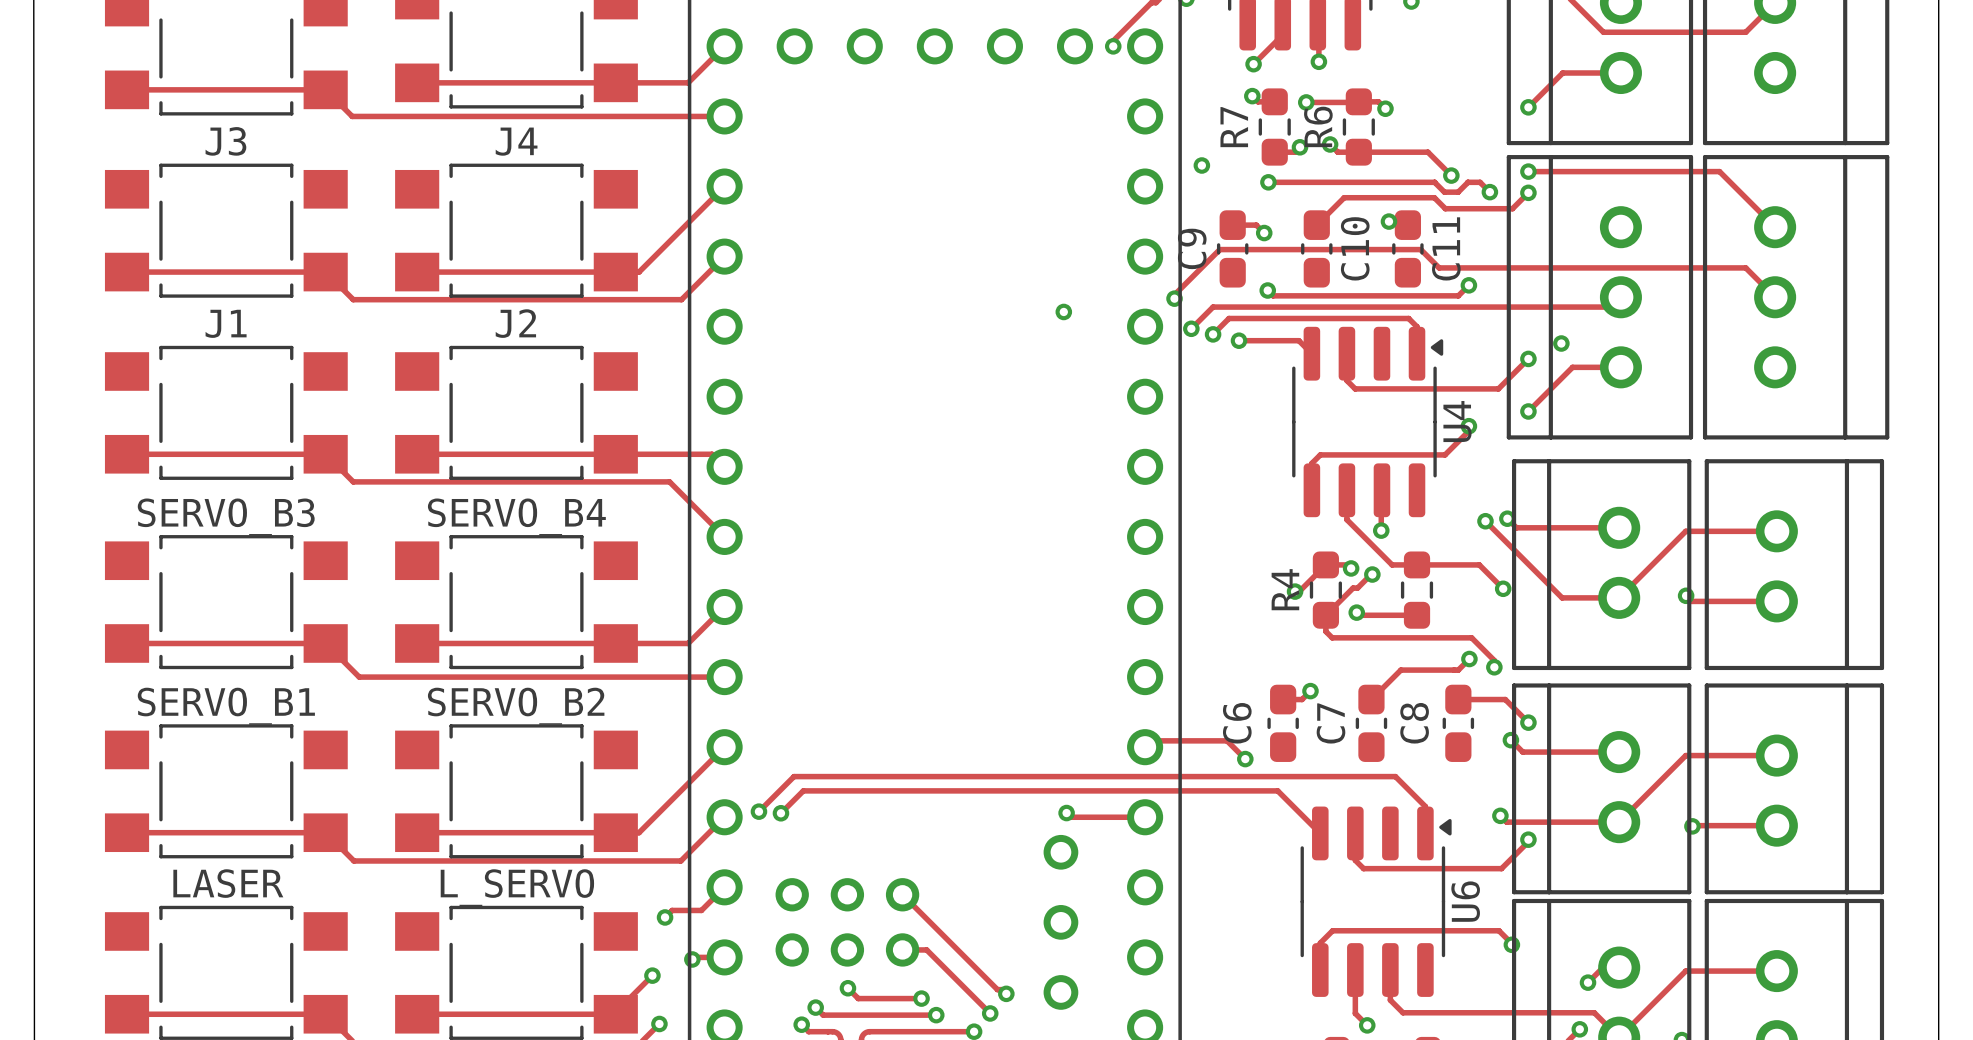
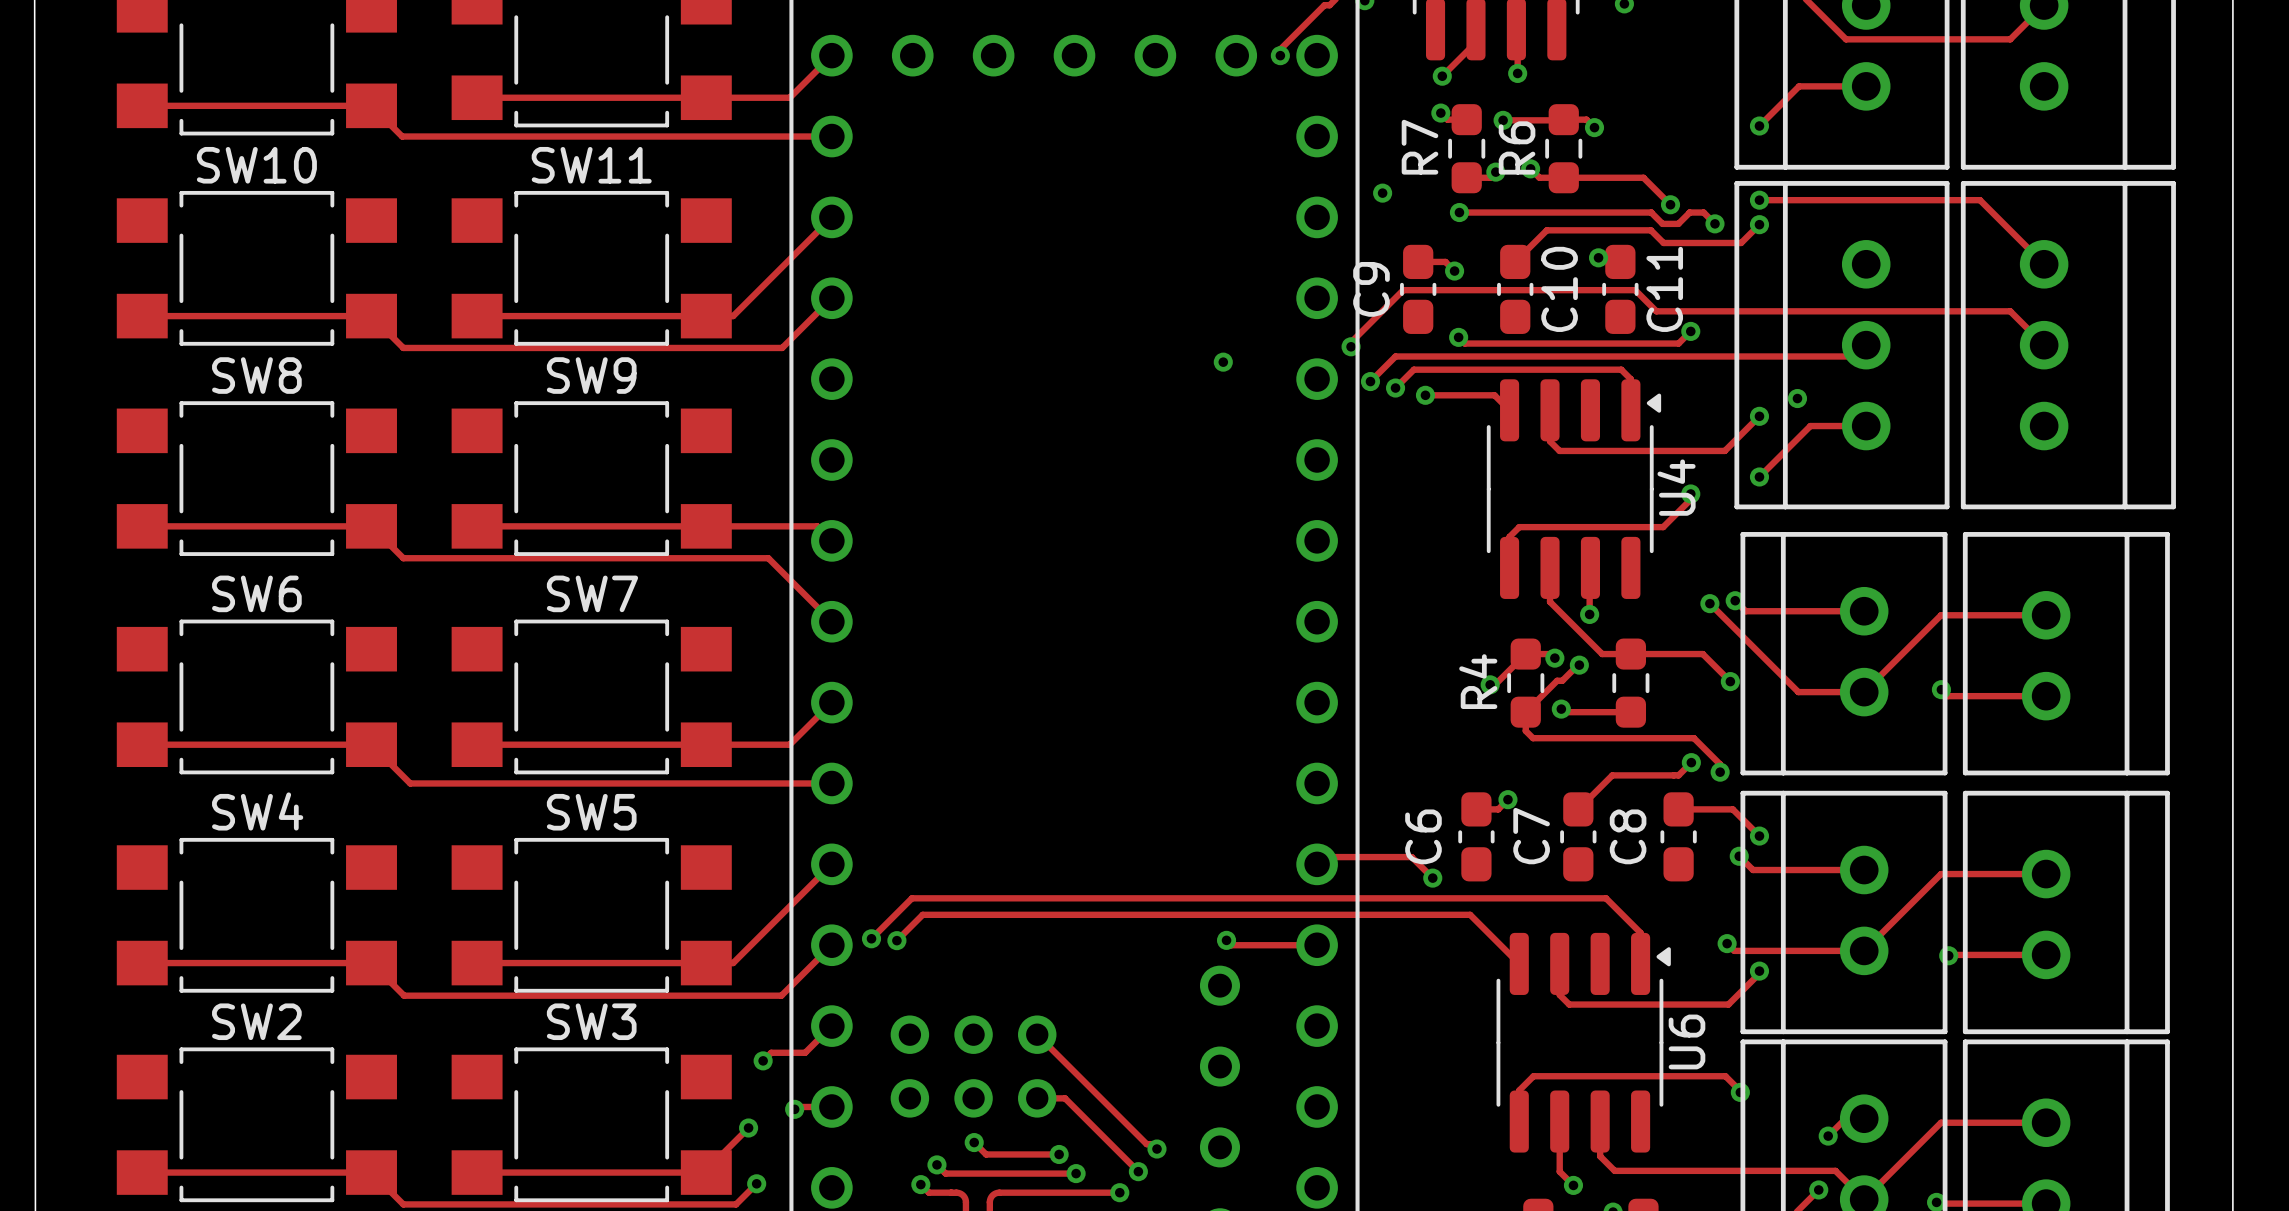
J3 name: J3 (225, 141) -> SW10 (256, 165)
J4 name: J4 (516, 141) -> SW11 (591, 165)
J1 name: J1 (226, 323) -> SW8 (256, 375)
J2 name: J2 (515, 323) -> SW9 (591, 375)
SERVO_B3 name: SERVO_B3 (226, 516) -> SW6 (256, 593)
SERVO_B4 name: SERVO_B4 (516, 516) -> SW7 (592, 593)
SERVO_B1 name: SERVO_B1 (226, 706) -> SW4 (257, 811)
SERVO_B2 name: SERVO_B2 (516, 706) -> SW5 (591, 812)
LASER name: LASER (228, 883) -> SW2 (256, 1021)
L_SERVO name: L_SERVO (517, 887) -> SW3 (591, 1021)

